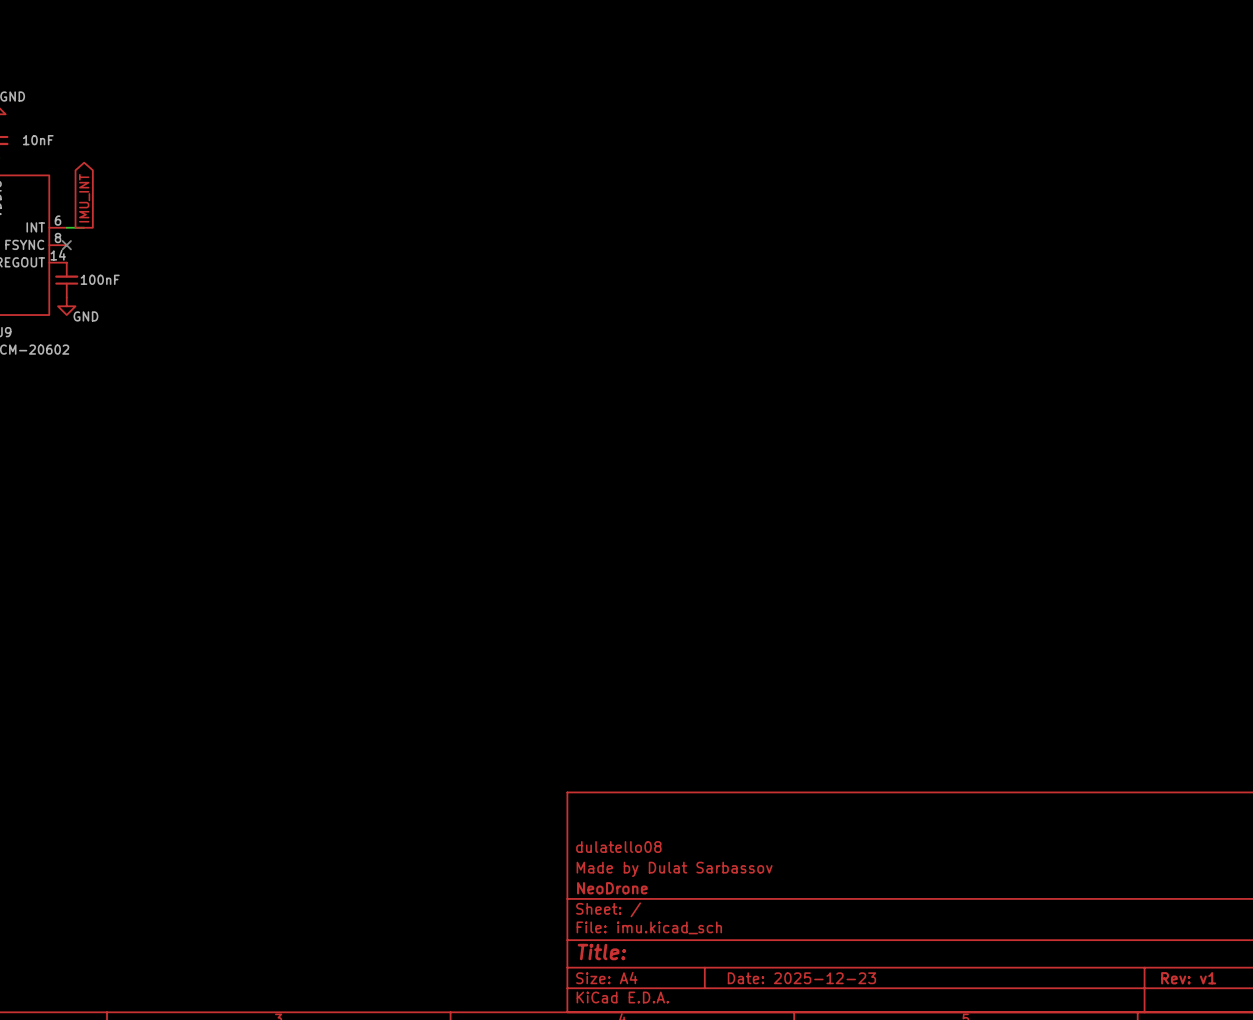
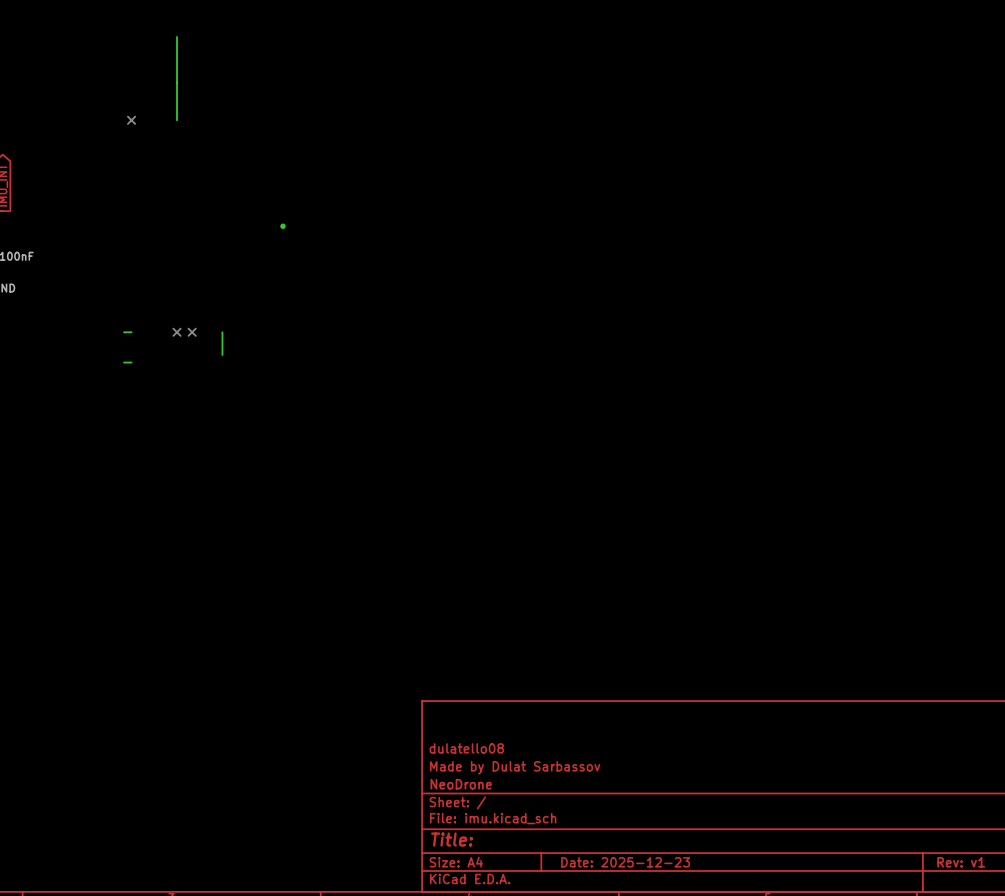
wire: none -> (176, 36) (176, 120)
no-connect mark: none -> (131, 120)
junction: none -> (283, 226)
wire: none -> (123, 332) (131, 332)
no-connect mark: none -> (176, 332)
no-connect mark: none -> (192, 332)
wire: none -> (222, 332) (222, 354)
wire: none -> (123, 362) (131, 362)

